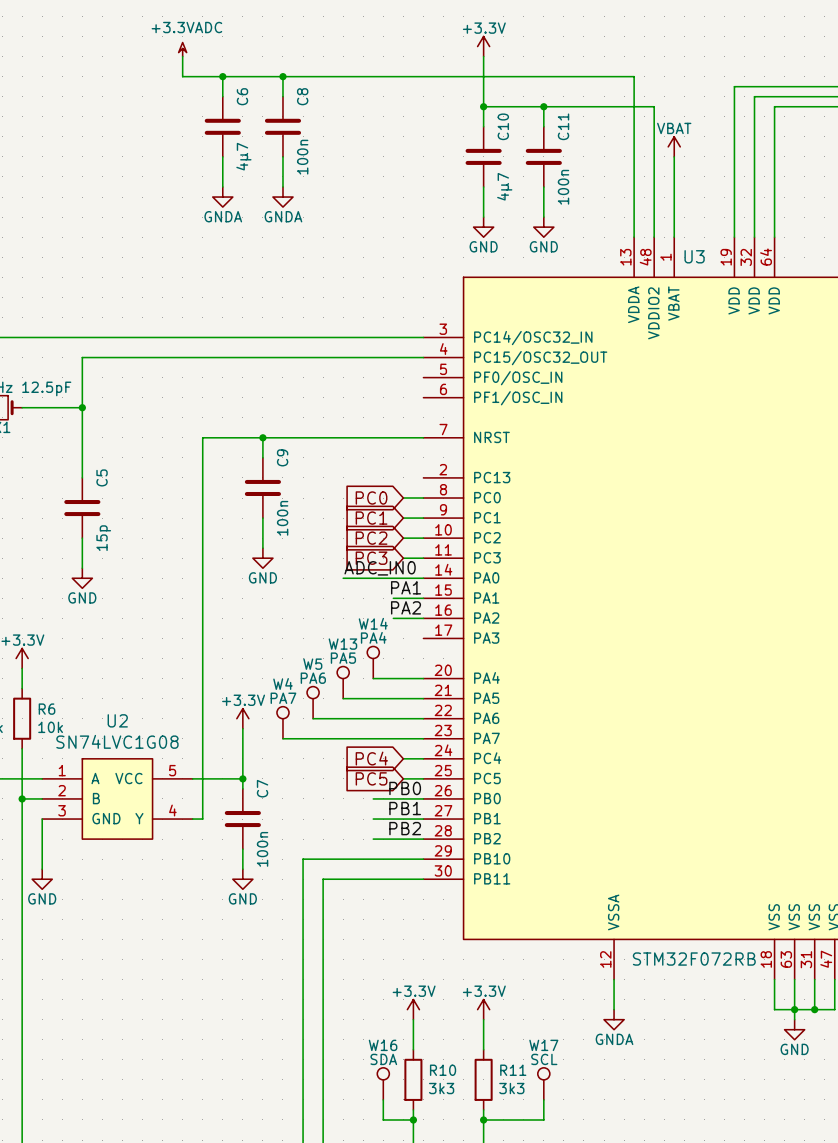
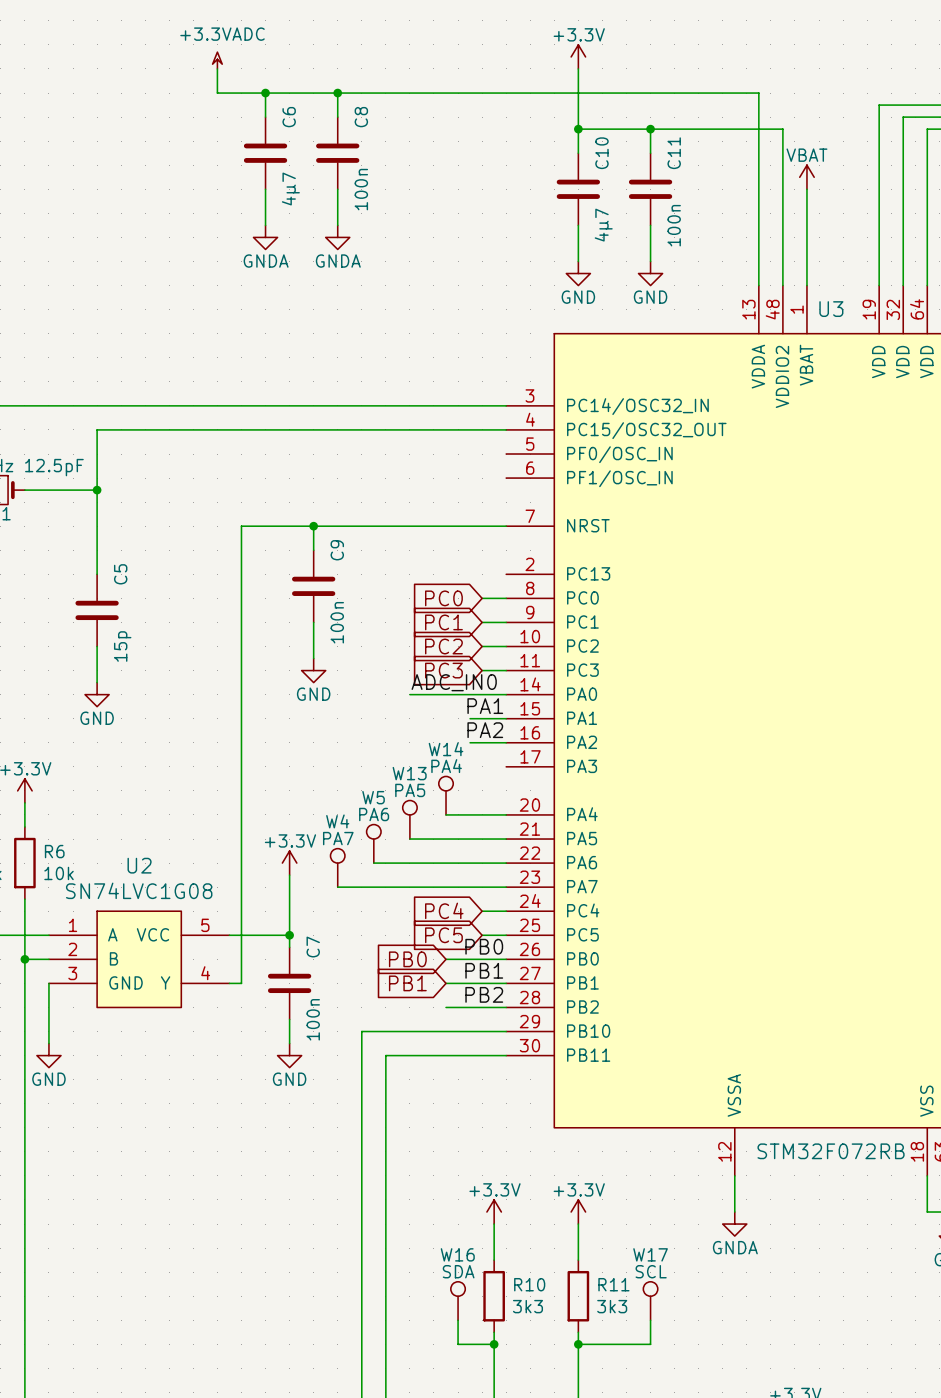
global label: none -> PB0 (407, 959)
global label: none -> PB1 (407, 983)

